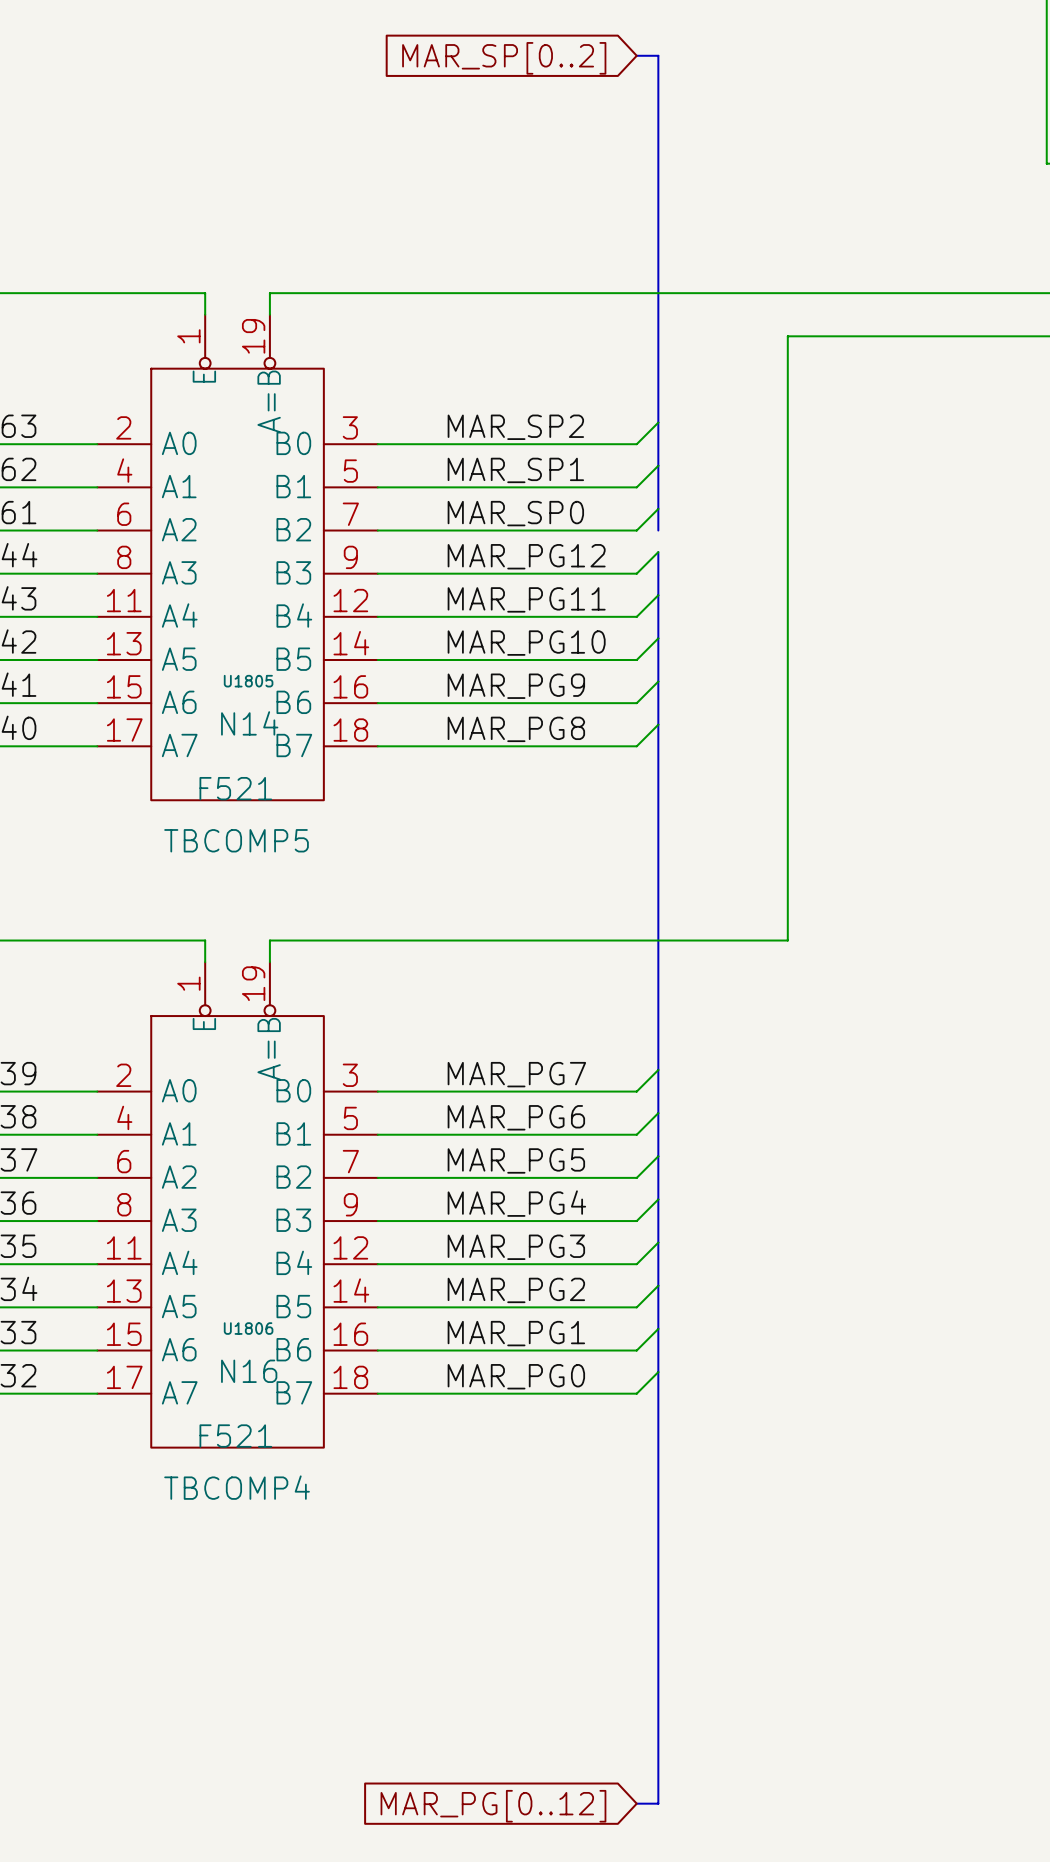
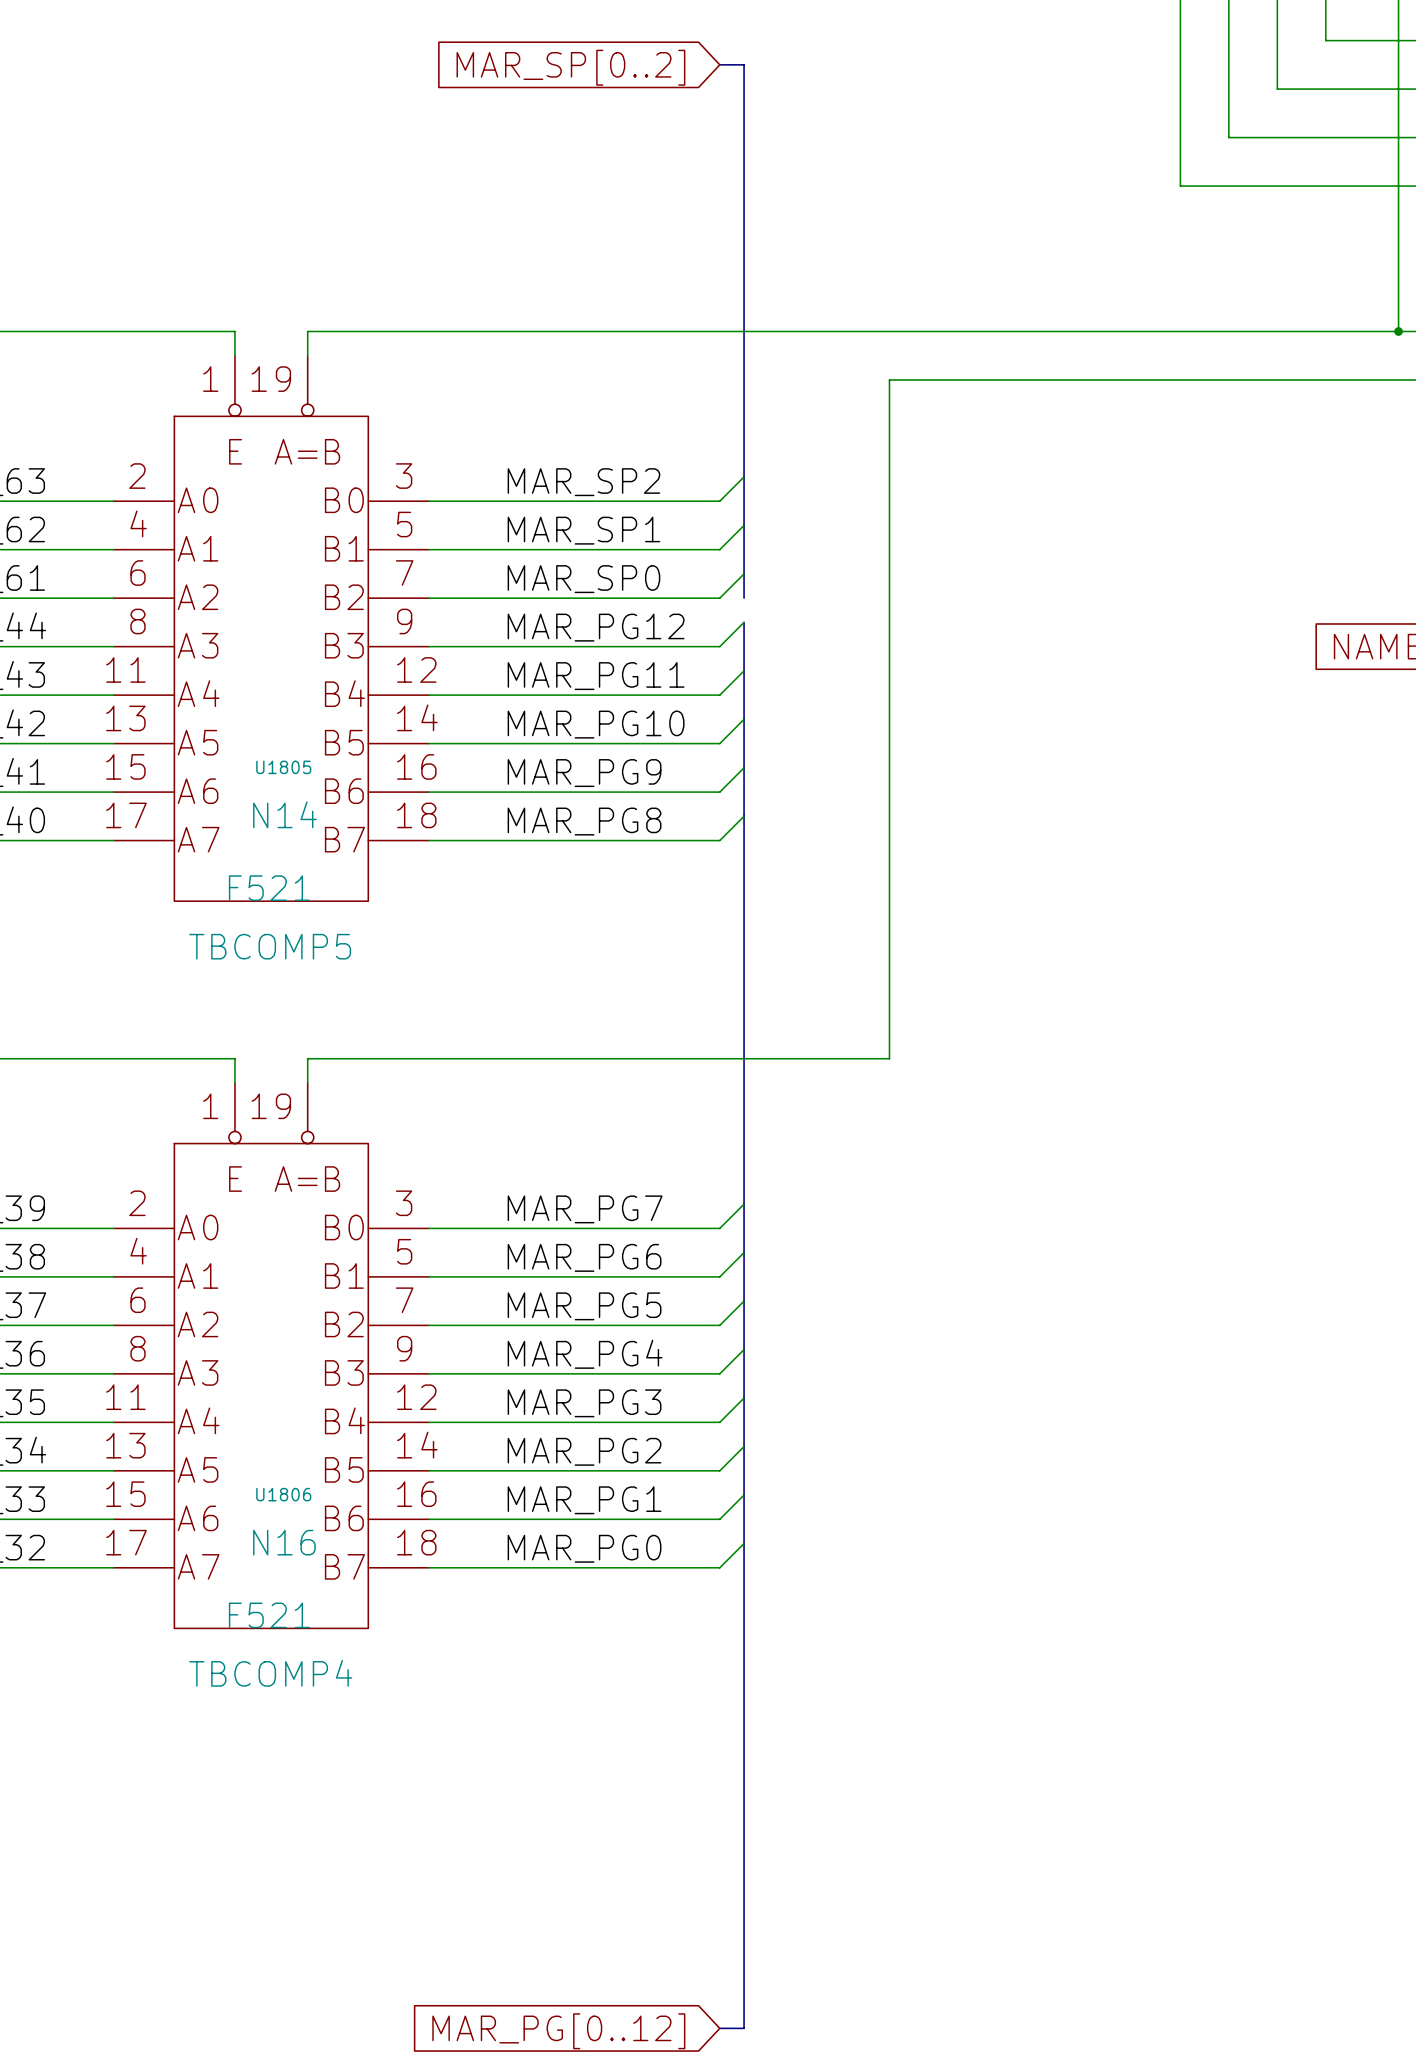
U1805 symbol: [97, 314, 378, 801] -> [113, 355, 429, 902]
U1806 symbol: [97, 962, 378, 1448] -> [113, 1082, 429, 1629]

